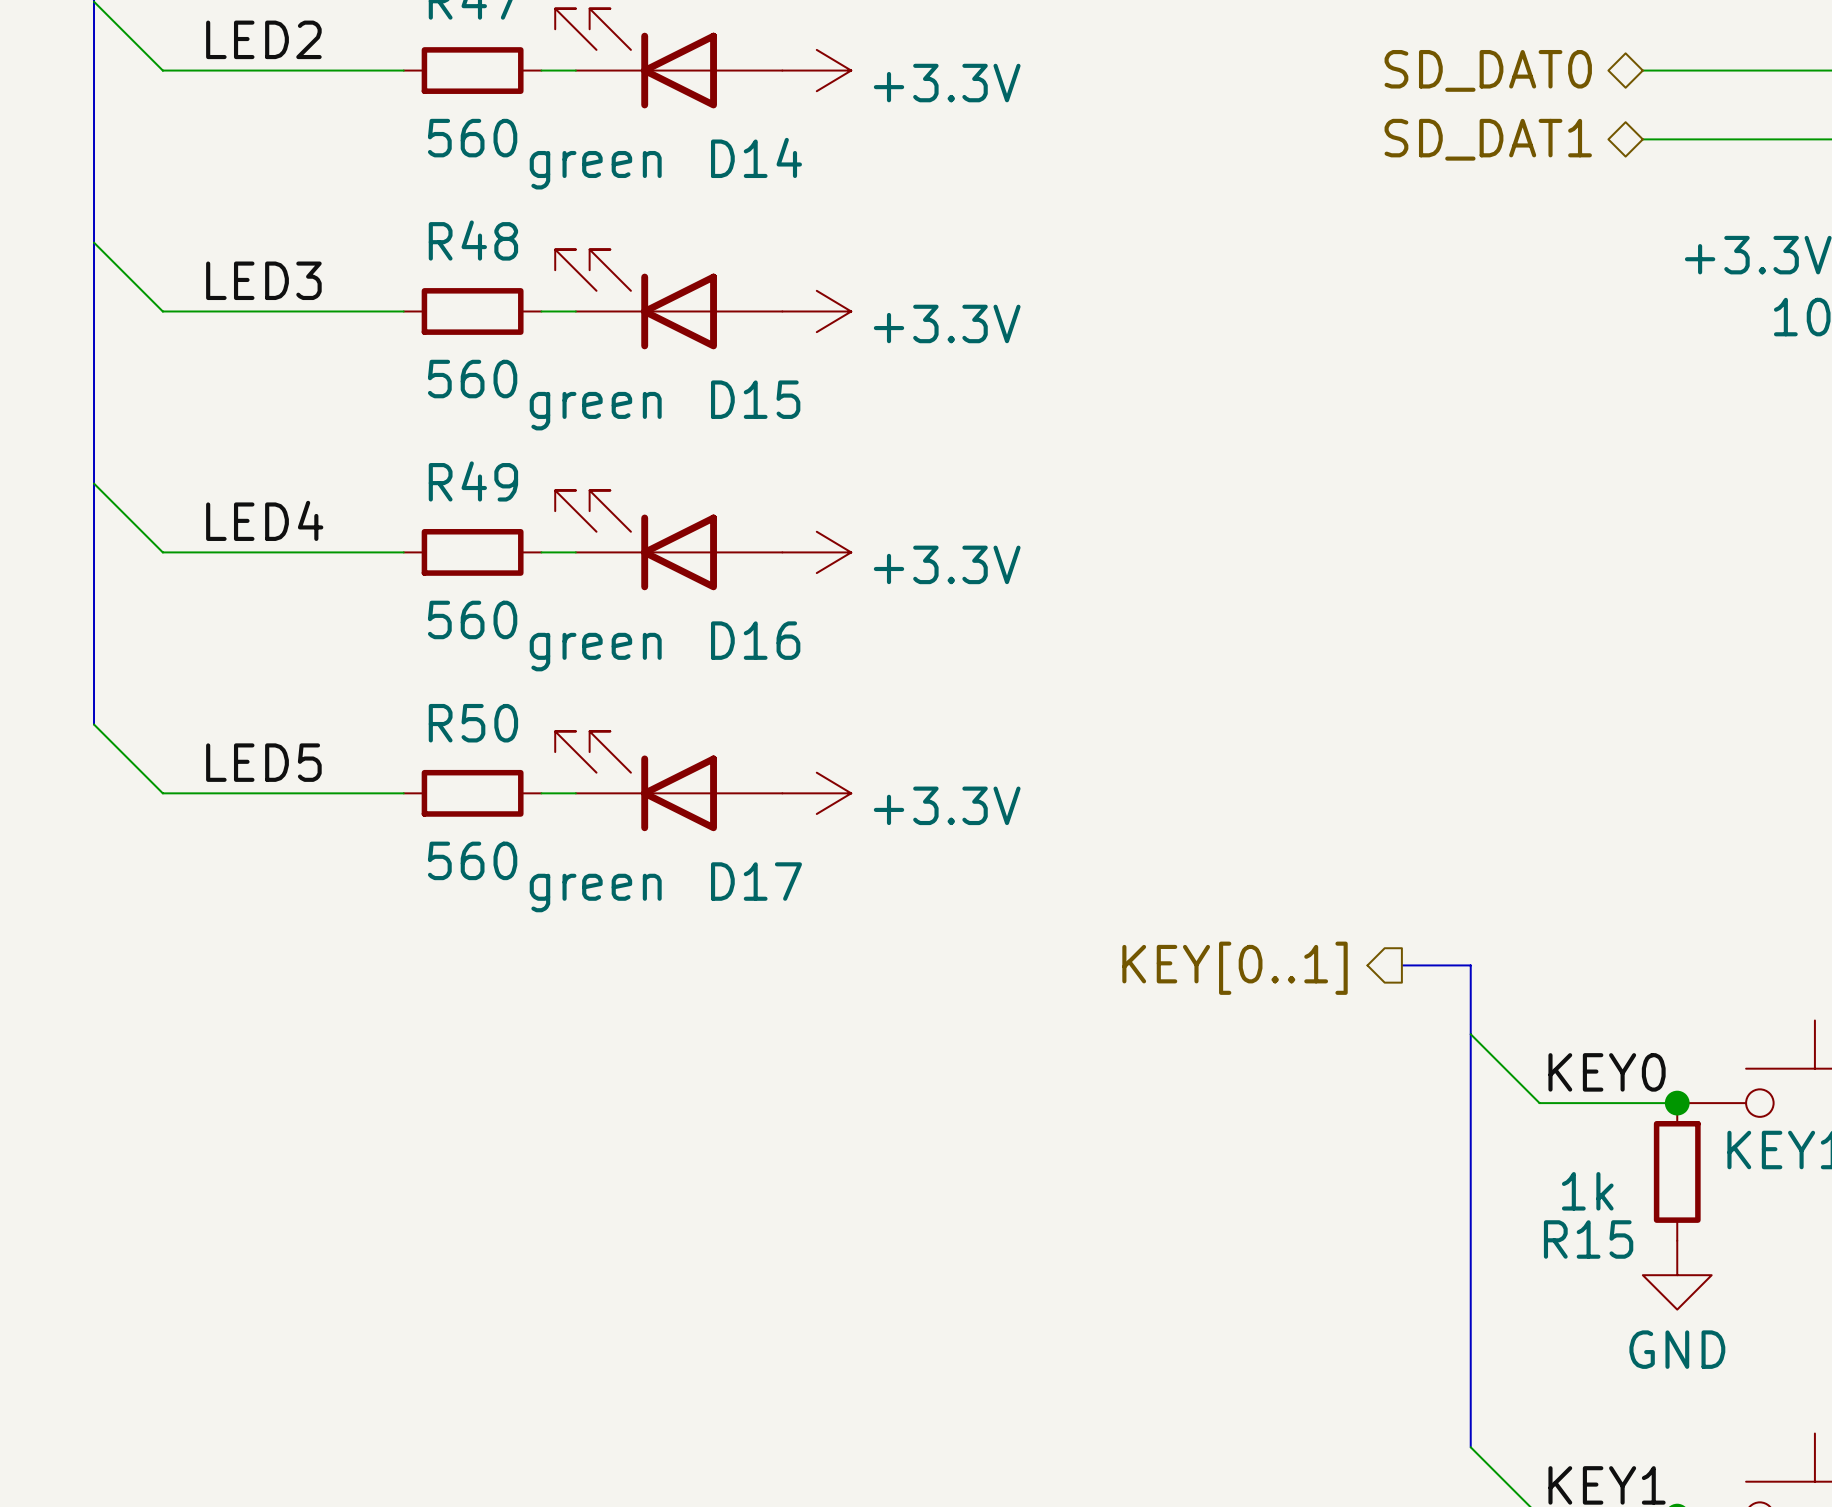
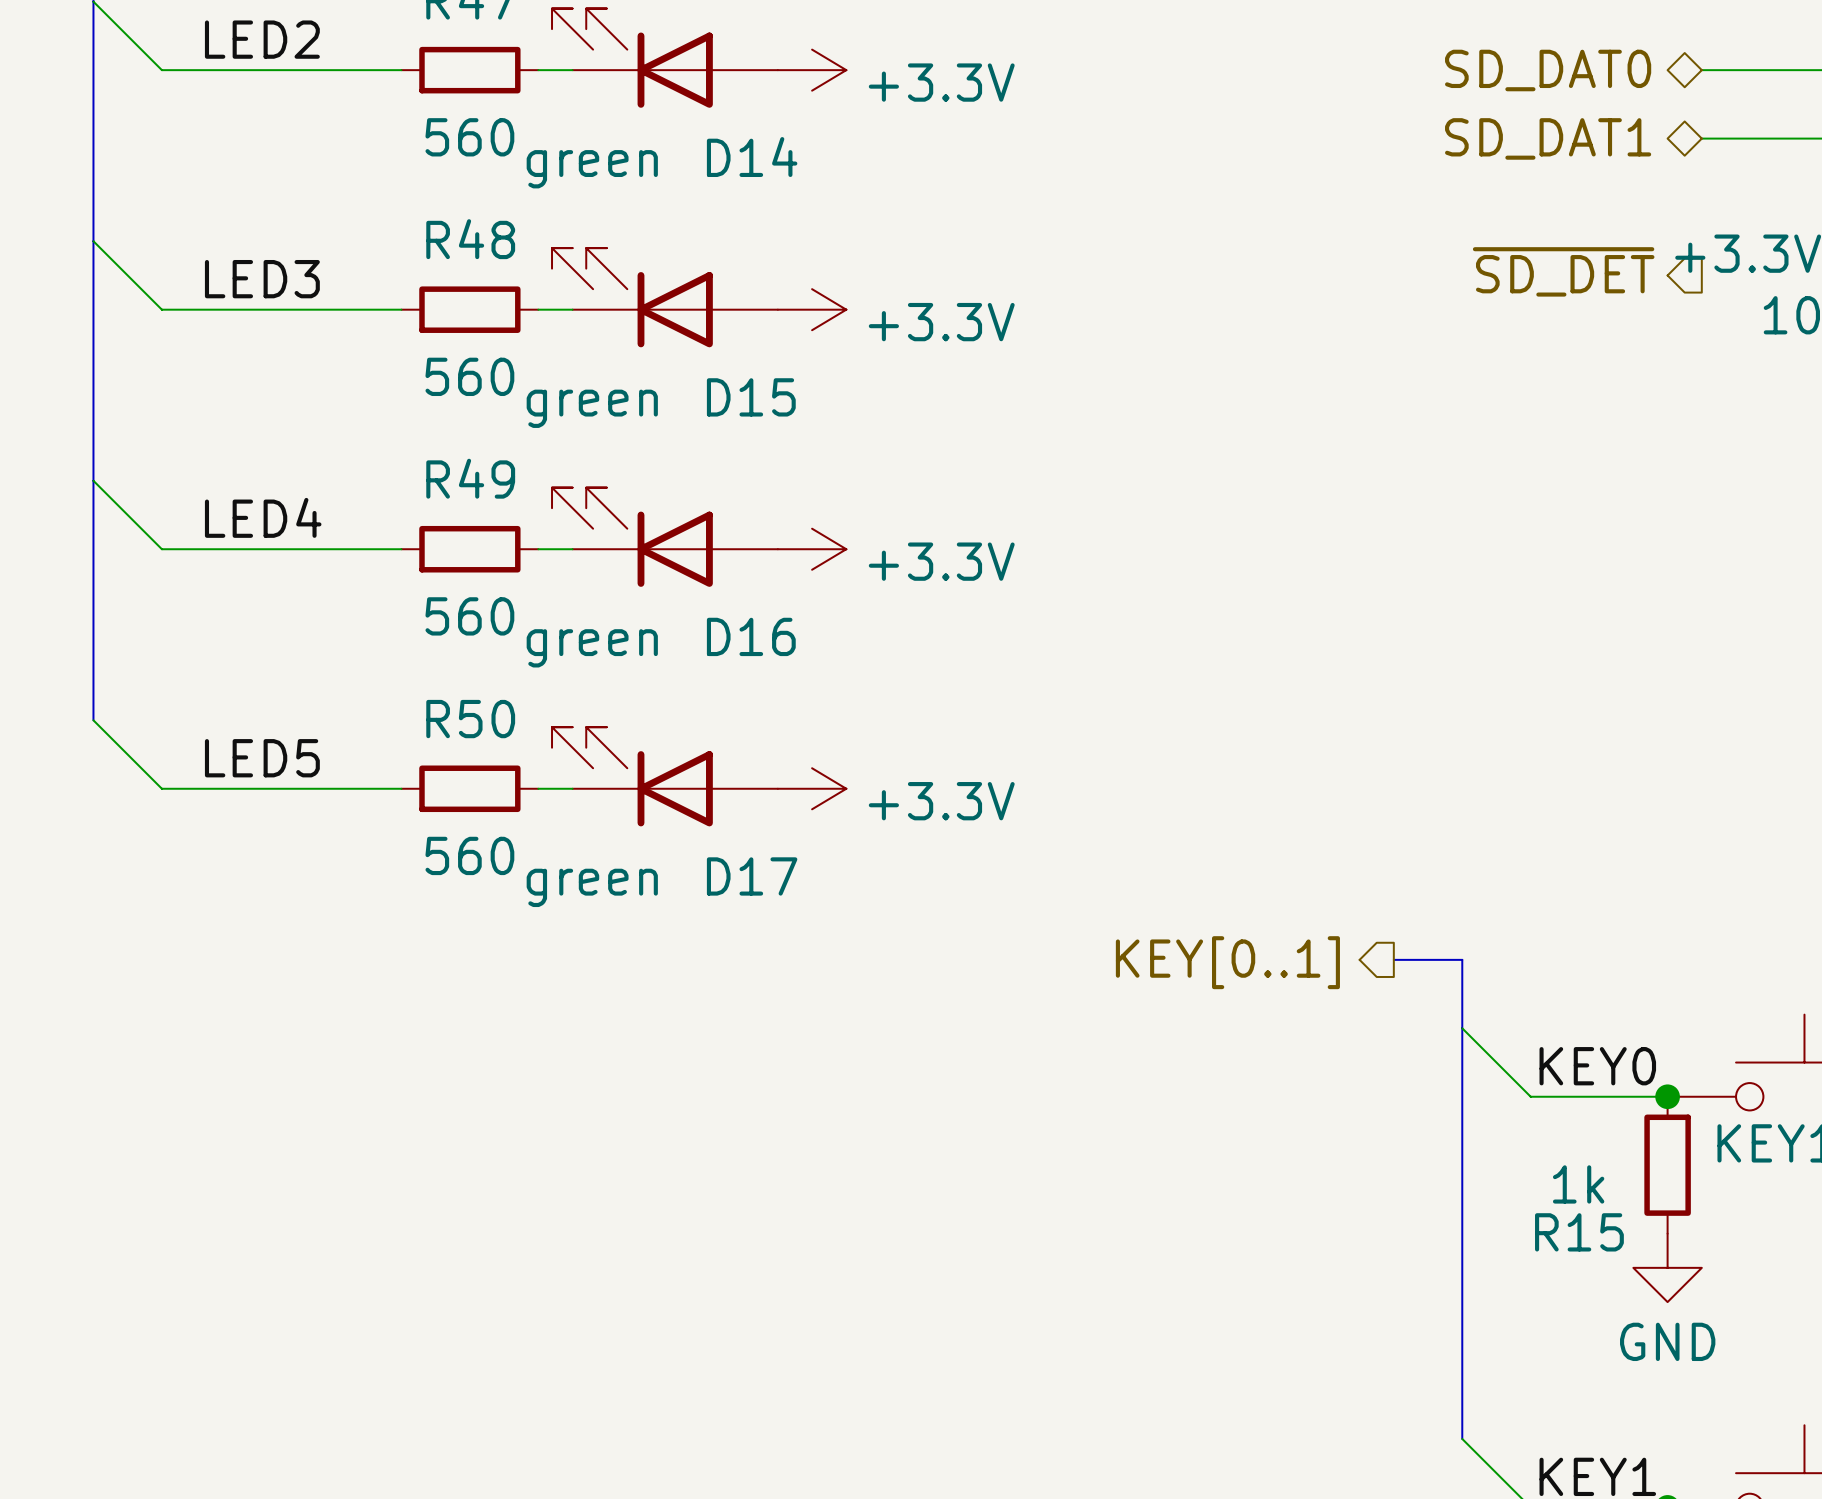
hierarchical label position: SD_DAT0 (1488, 70) -> SD_DAT0 (1548, 70)
wire: (1642, 70) (1711, 70) -> none
hierarchical label position: SD_DAT1 (1488, 139) -> SD_DAT1 (1548, 138)
wire: (1642, 139) (1711, 139) -> none
hierarchical label: none -> ~{SD_DET} (1563, 271)

